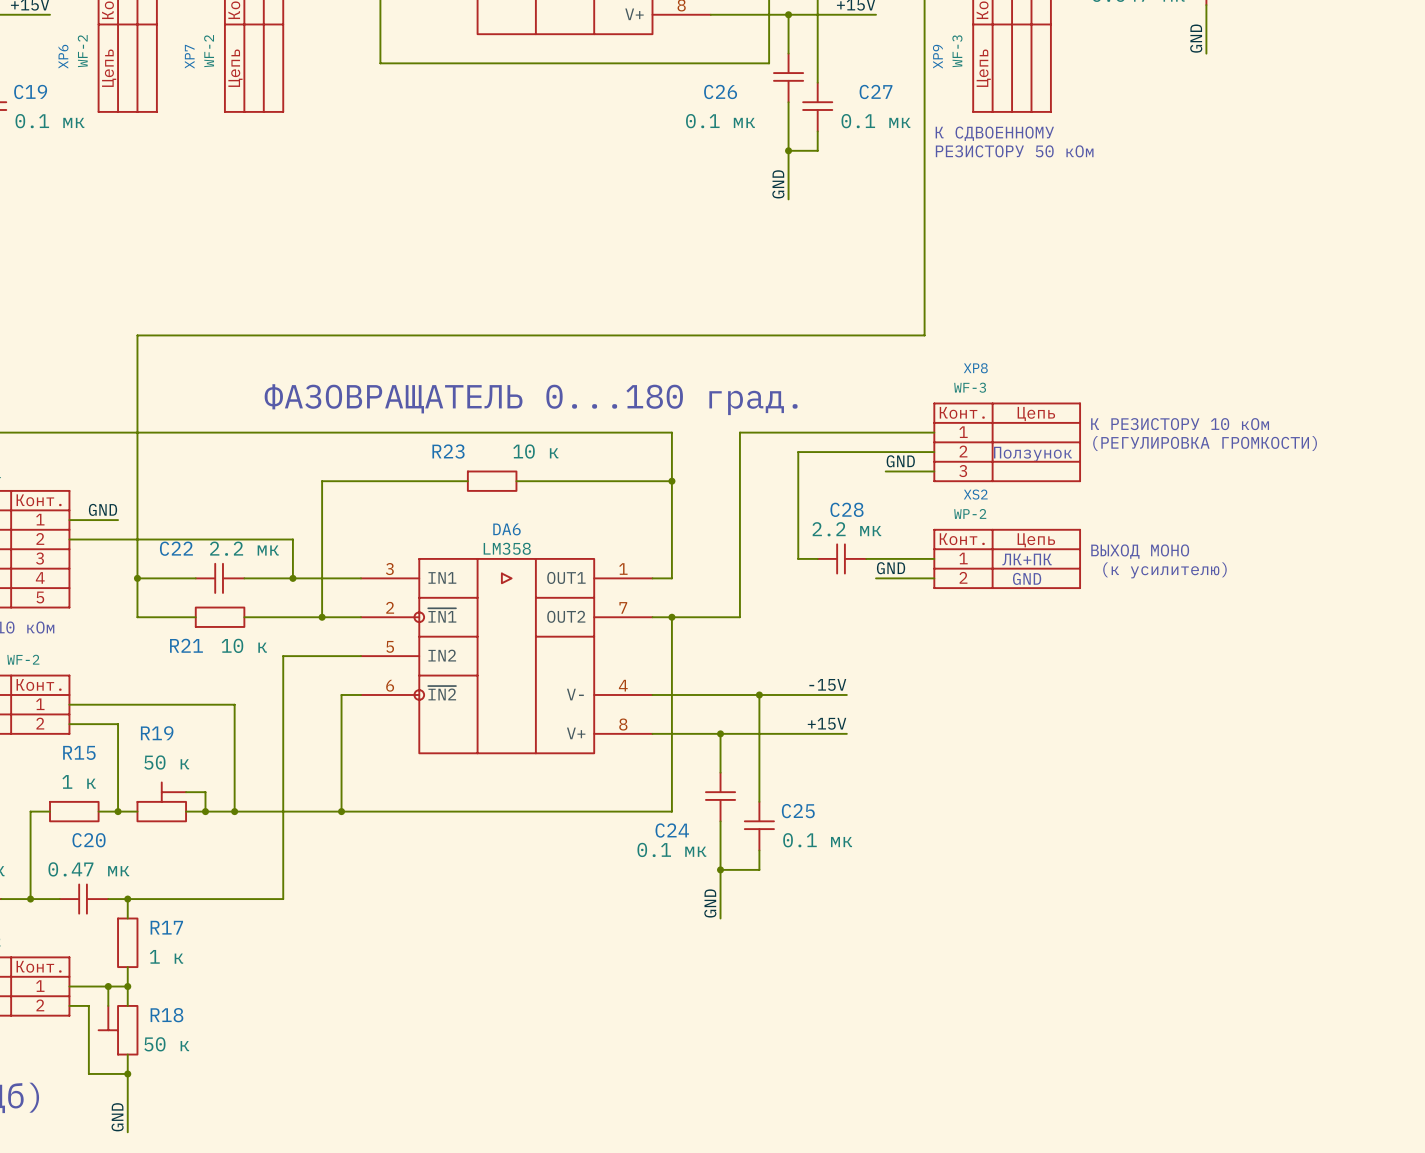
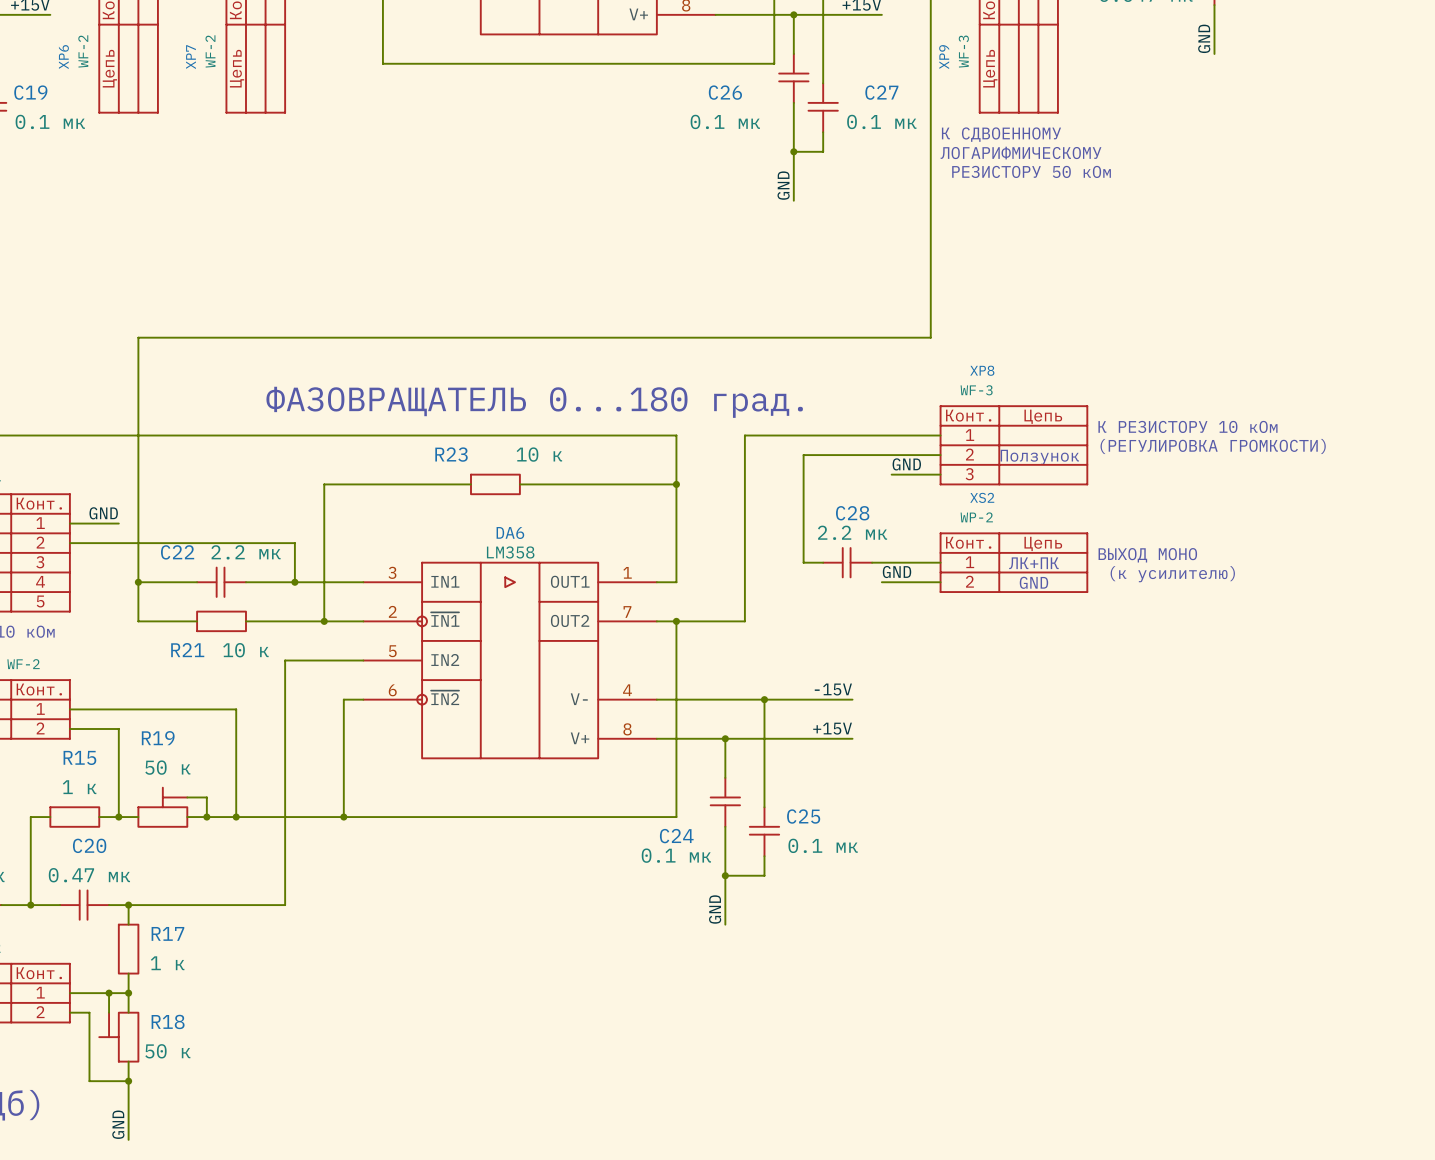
text: РЕЗИСТОРУ 50 кОм (1014, 151) -> ЛОГАРИФМИЧЕСКОМУ (1021, 153)
text: none -> РЕЗИСТОРУ 50 кОм (1031, 171)

